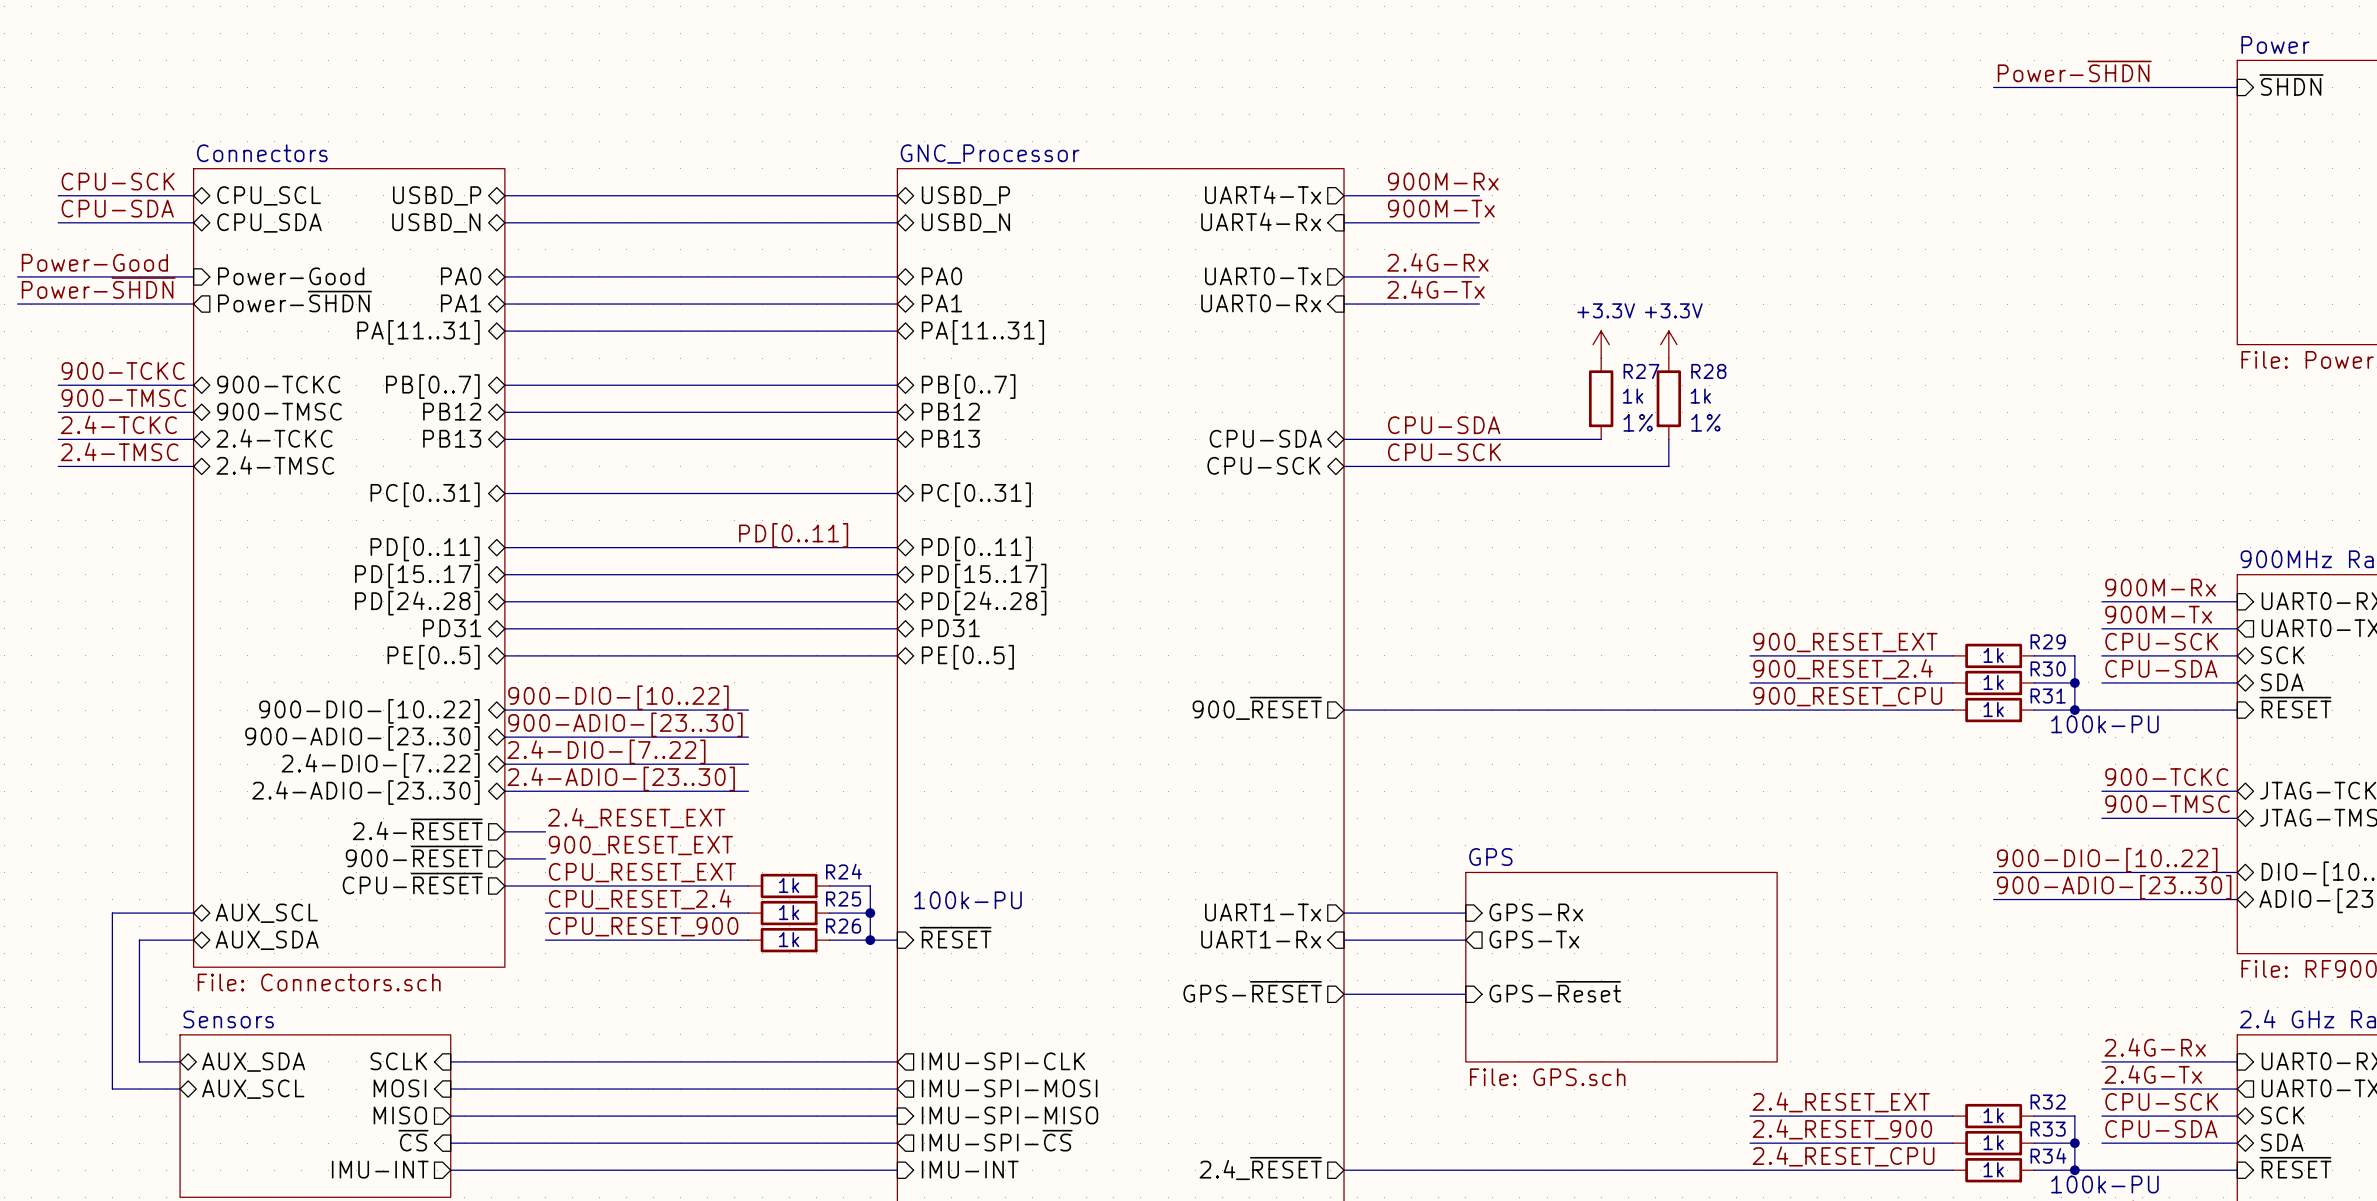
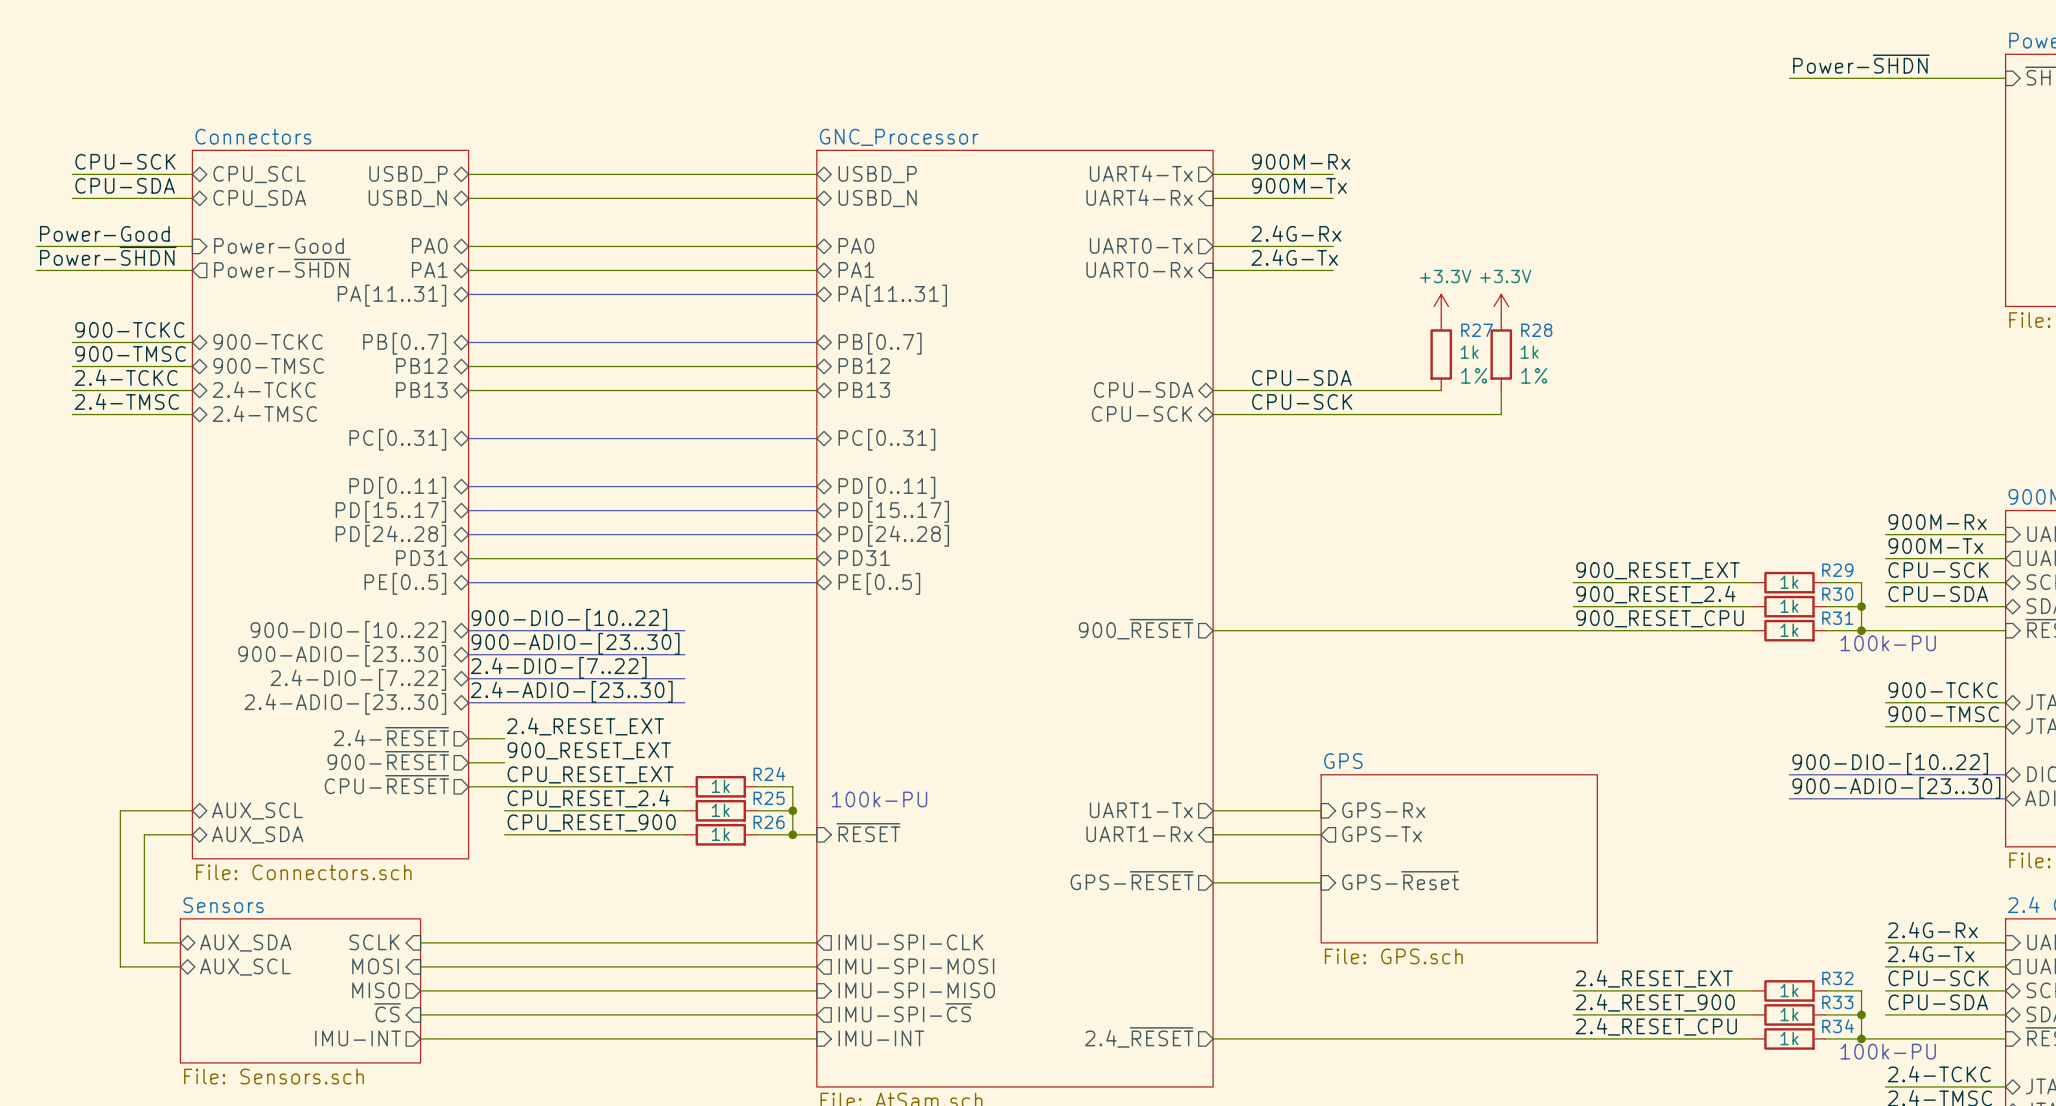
label: PD[0..11] (793, 535) -> none

